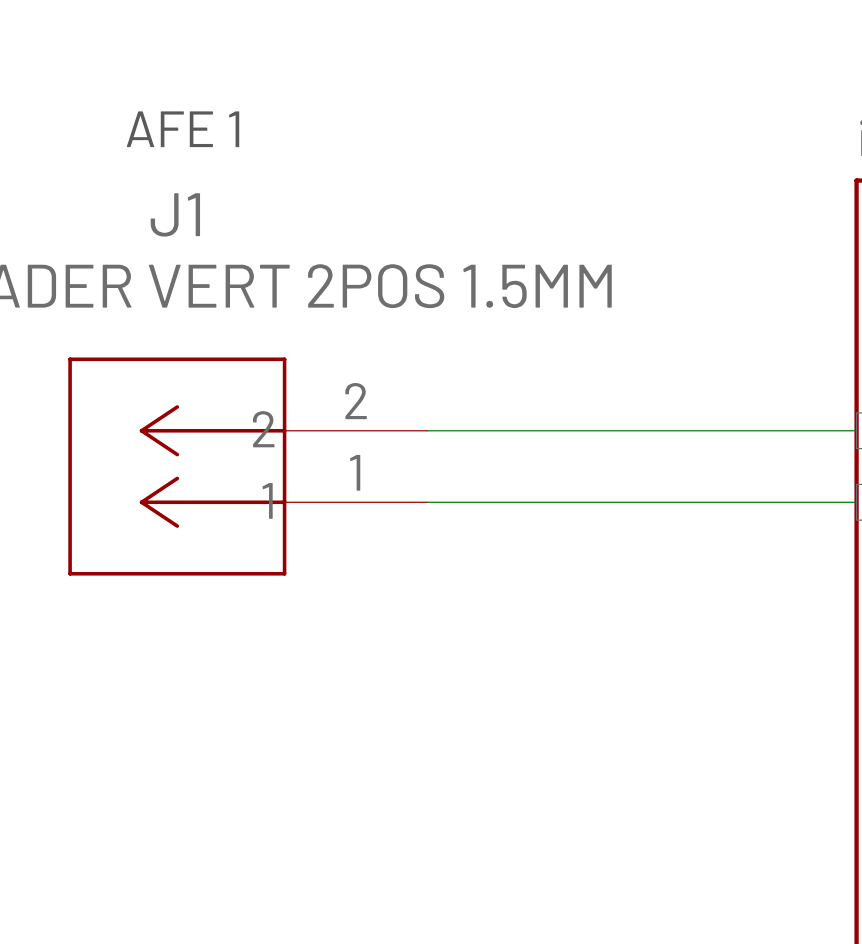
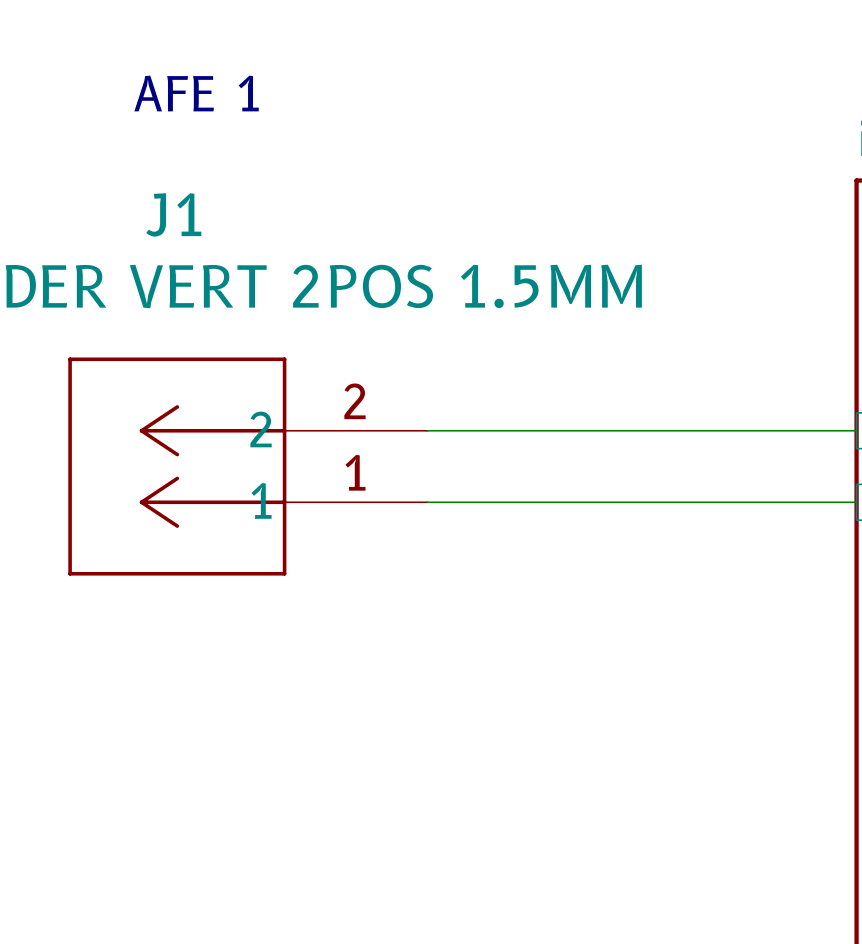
text position: AFE 1 (182, 129) -> AFE 1 (196, 93)

